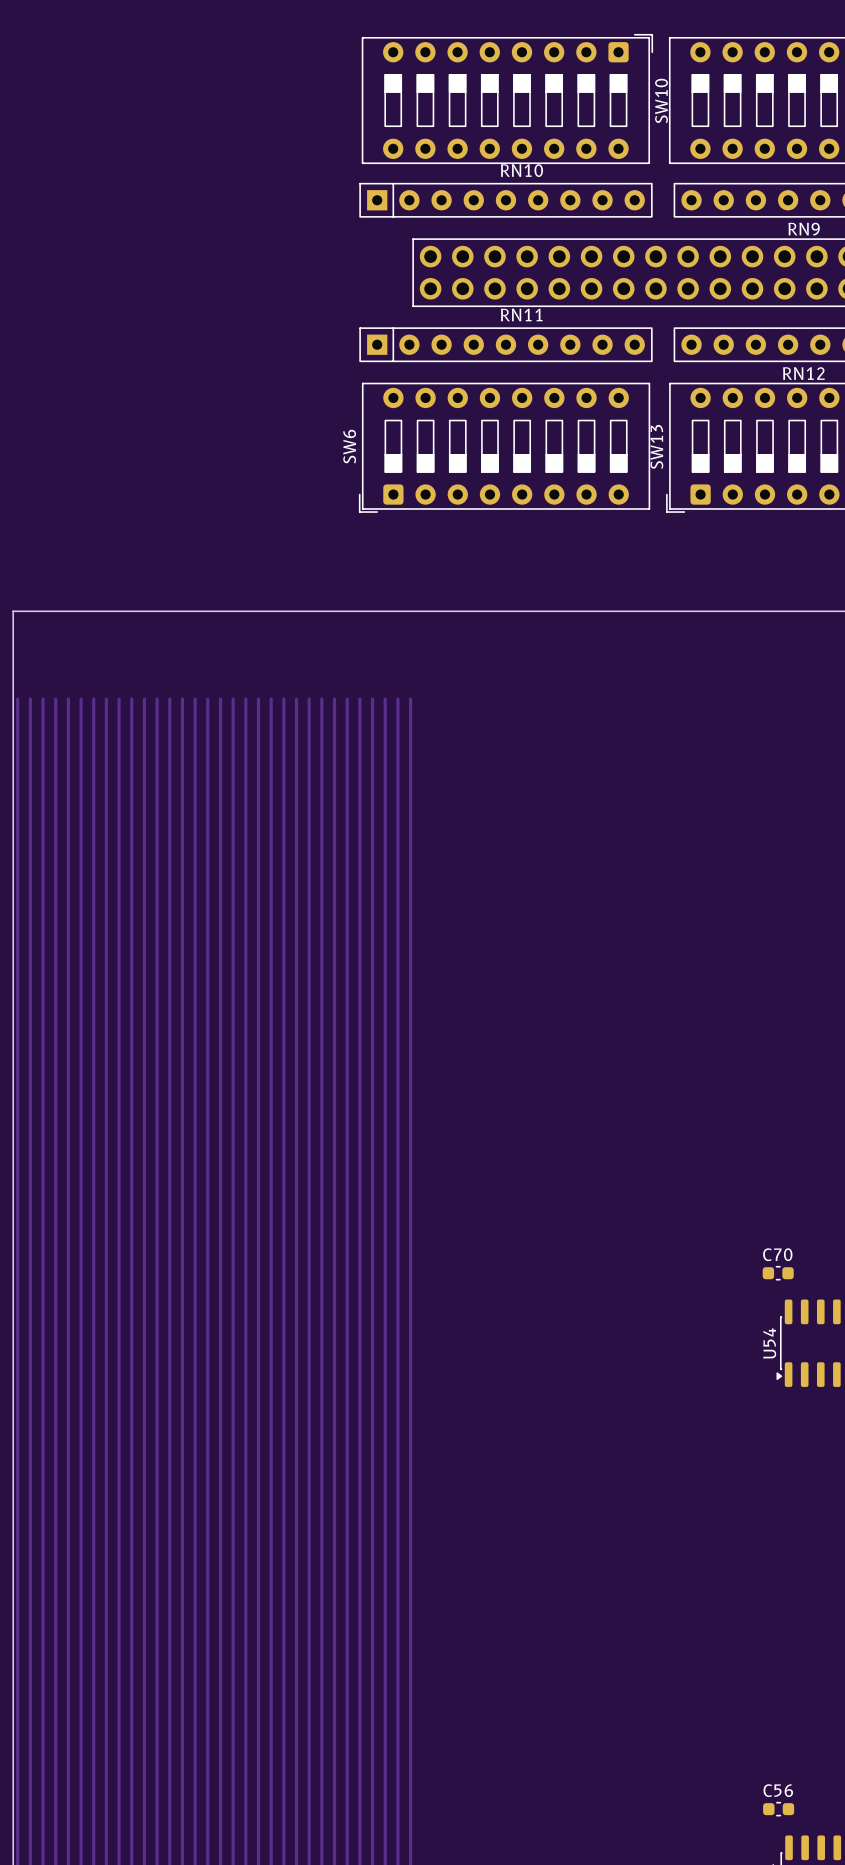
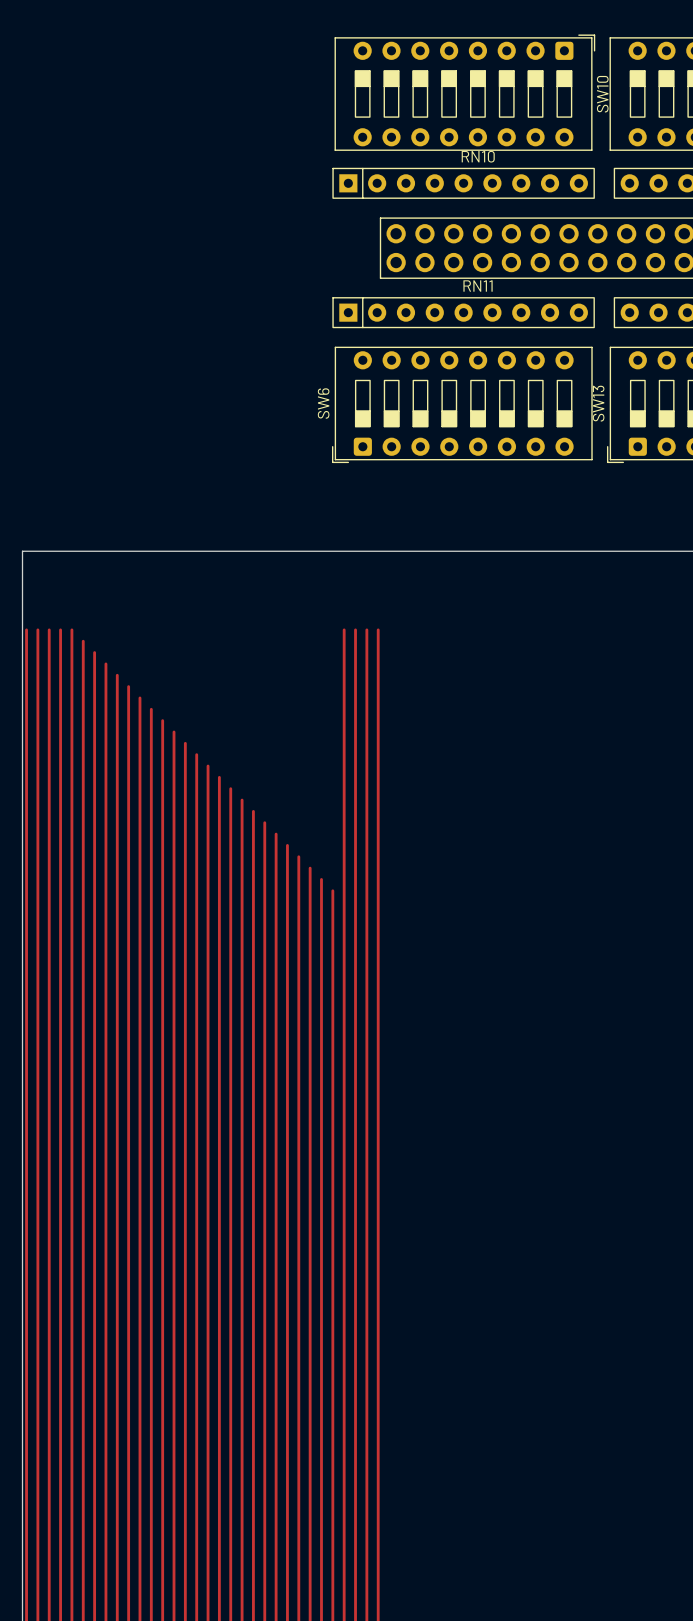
track: (81, 699) (81, 711) -> none
track: (93, 699) (93, 724) -> none
track: (106, 699) (106, 737) -> none
track: (119, 699) (119, 749) -> none
track: (131, 699) (131, 762) -> none
track: (144, 699) (144, 775) -> none
track: (157, 699) (157, 787) -> none
track: (169, 699) (169, 800) -> none
track: (182, 699) (182, 813) -> none
track: (195, 699) (195, 825) -> none
track: (207, 699) (207, 838) -> none
track: (220, 699) (220, 851) -> none
track: (233, 699) (233, 863) -> none
track: (245, 699) (245, 876) -> none
track: (258, 699) (258, 889) -> none
track: (271, 699) (271, 901) -> none
track: (283, 699) (283, 914) -> none
track: (296, 699) (296, 927) -> none
track: (309, 699) (309, 939) -> none
track: (321, 699) (321, 952) -> none
track: (334, 699) (334, 965) -> none
track: (347, 699) (347, 977) -> none
track: (359, 699) (359, 990) -> none

